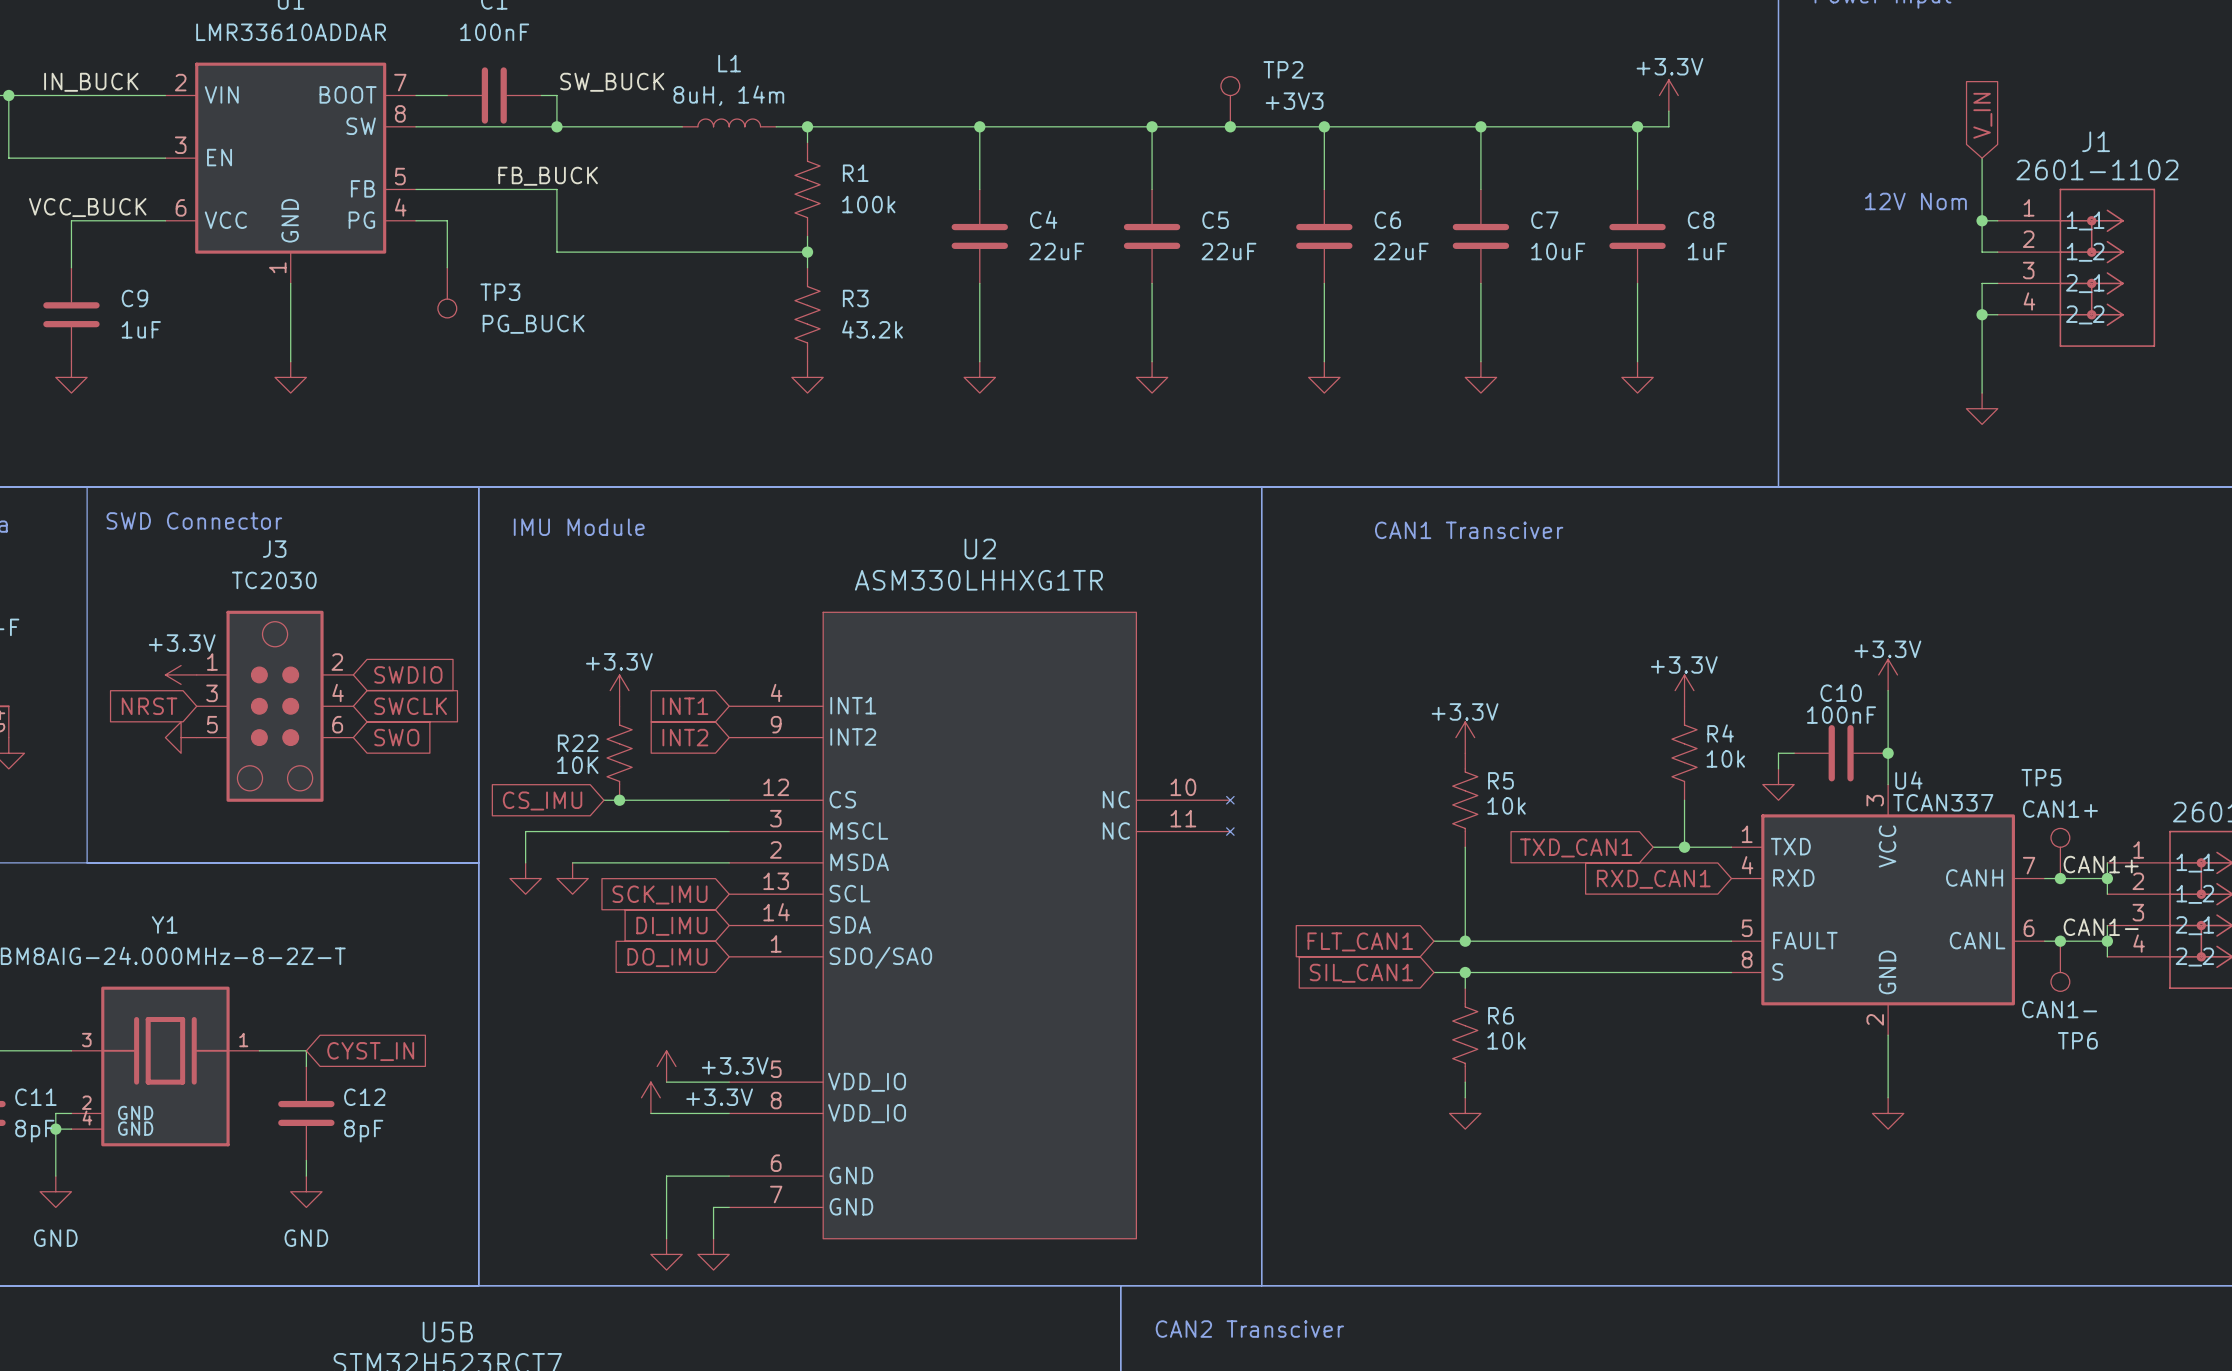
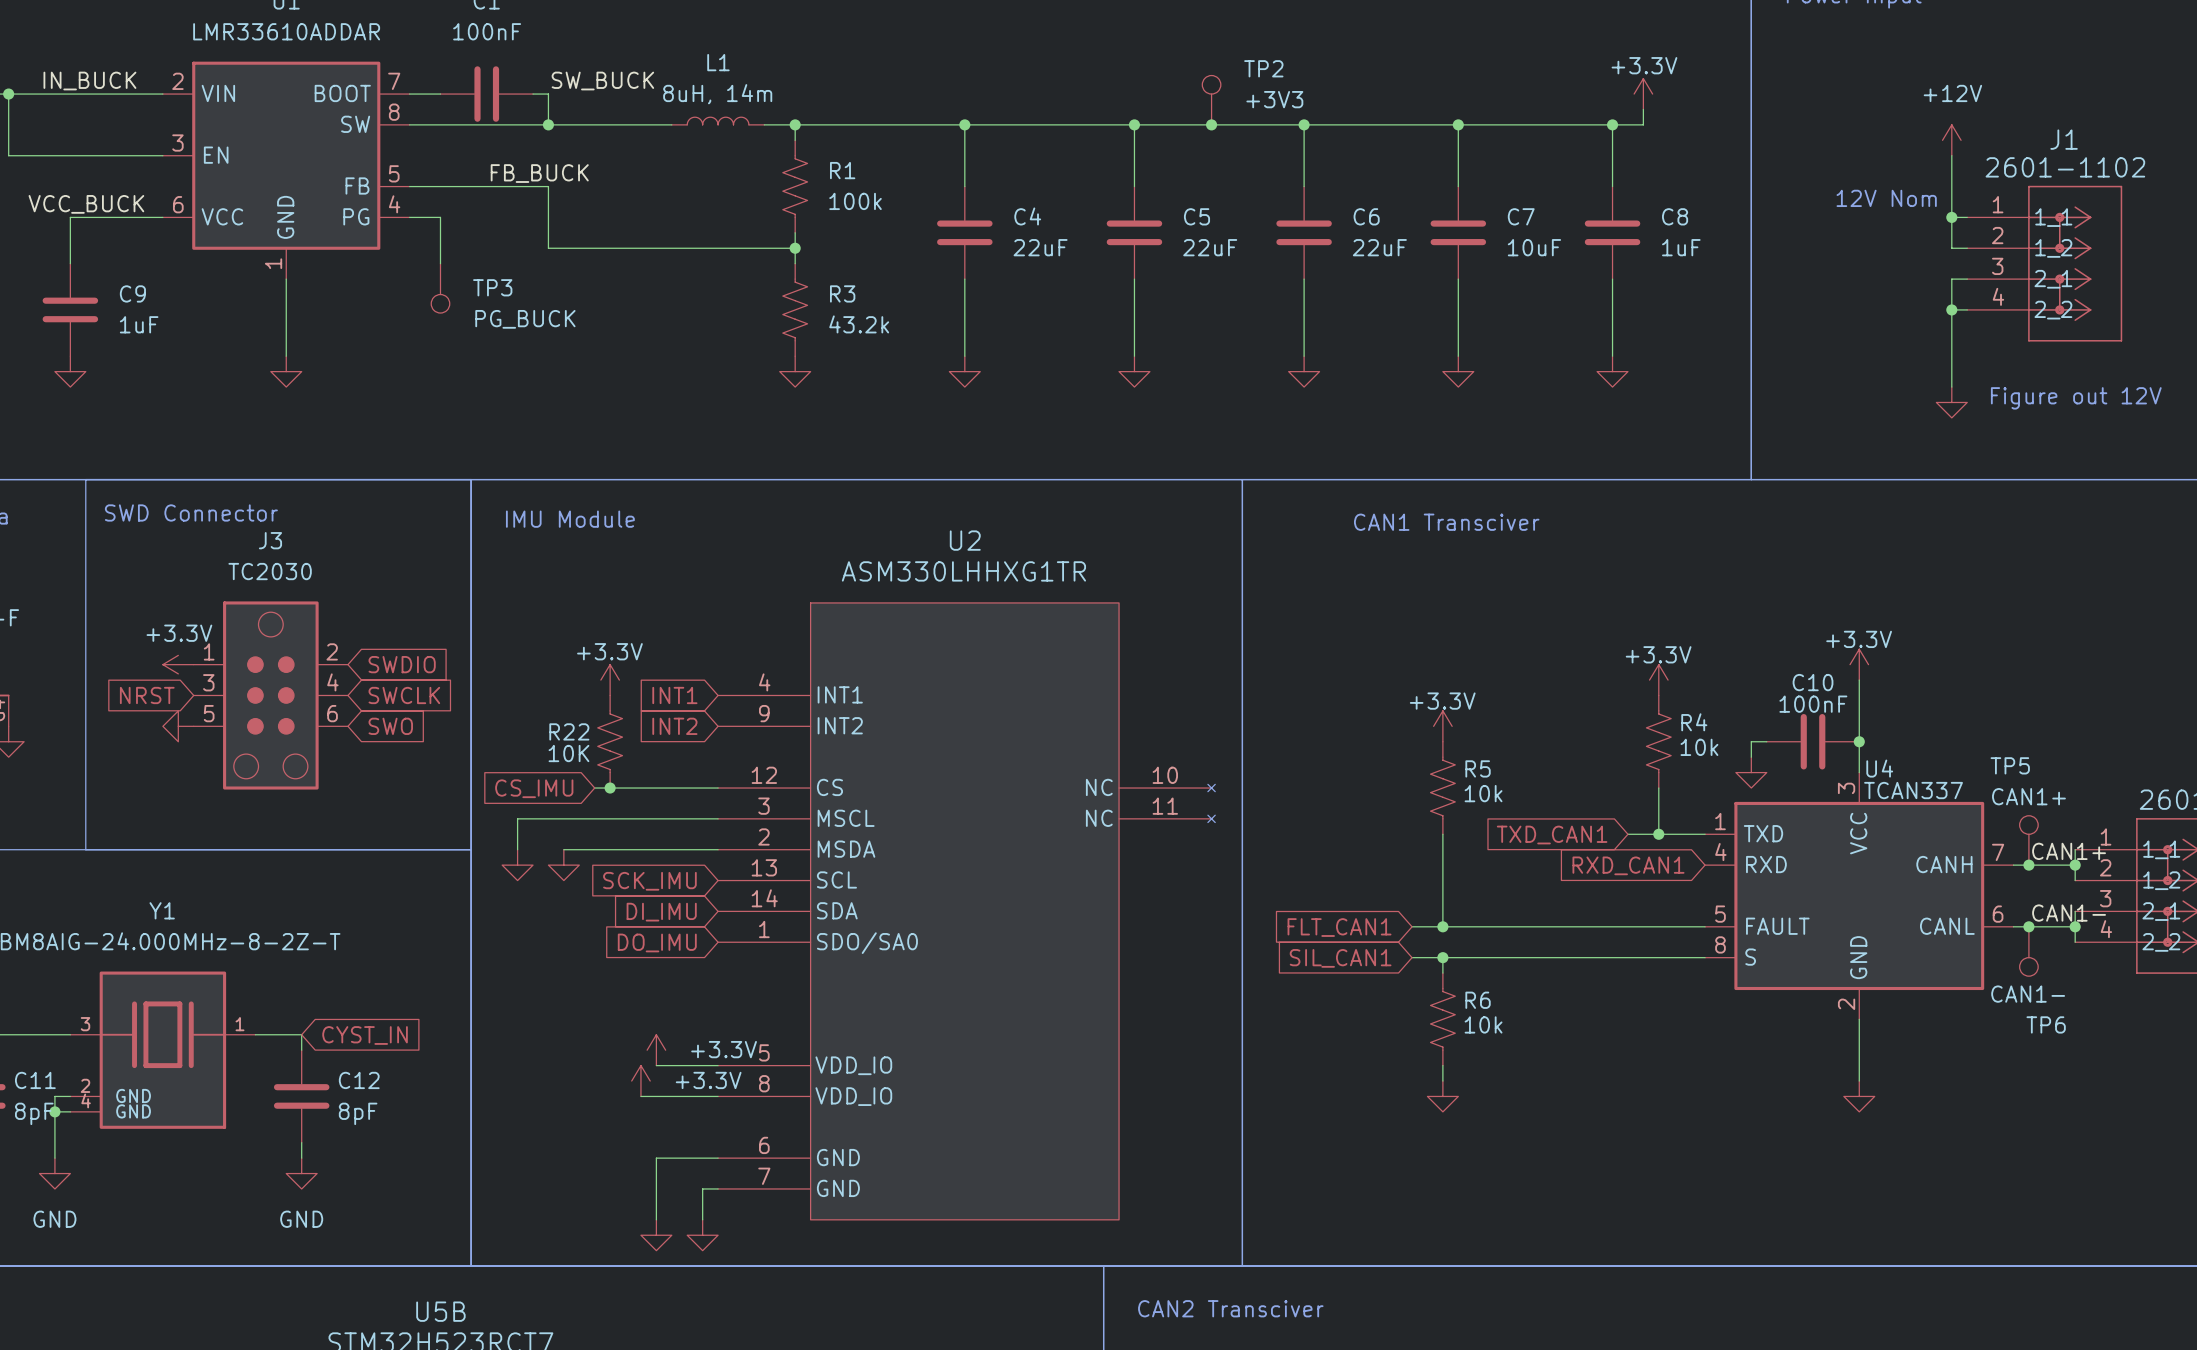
global label: V_IN (1982, 115) -> none
power symbol: none -> +12V (1951, 140)
text: none -> Figure out 12V (2076, 398)

